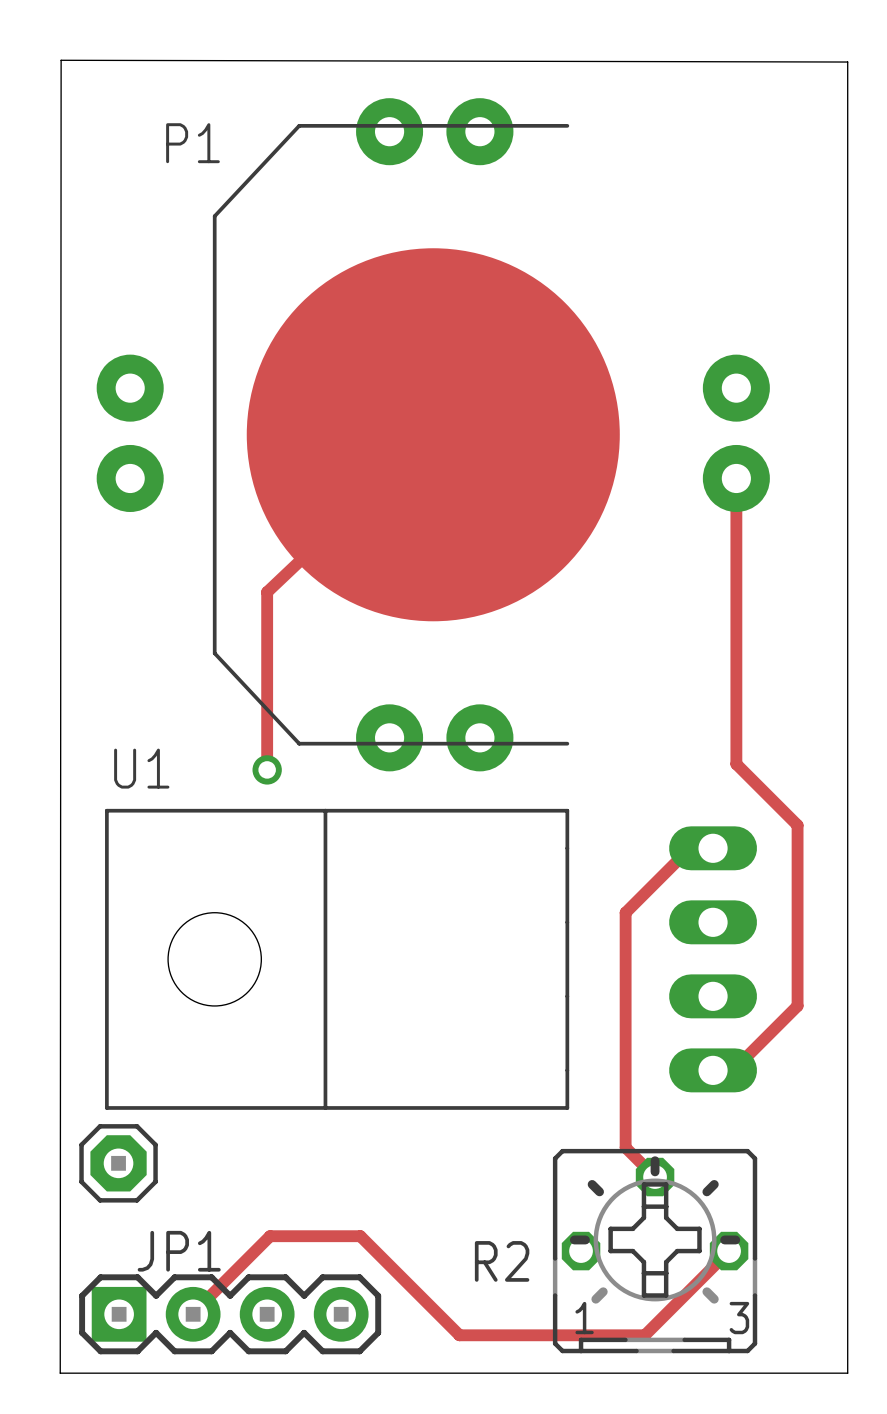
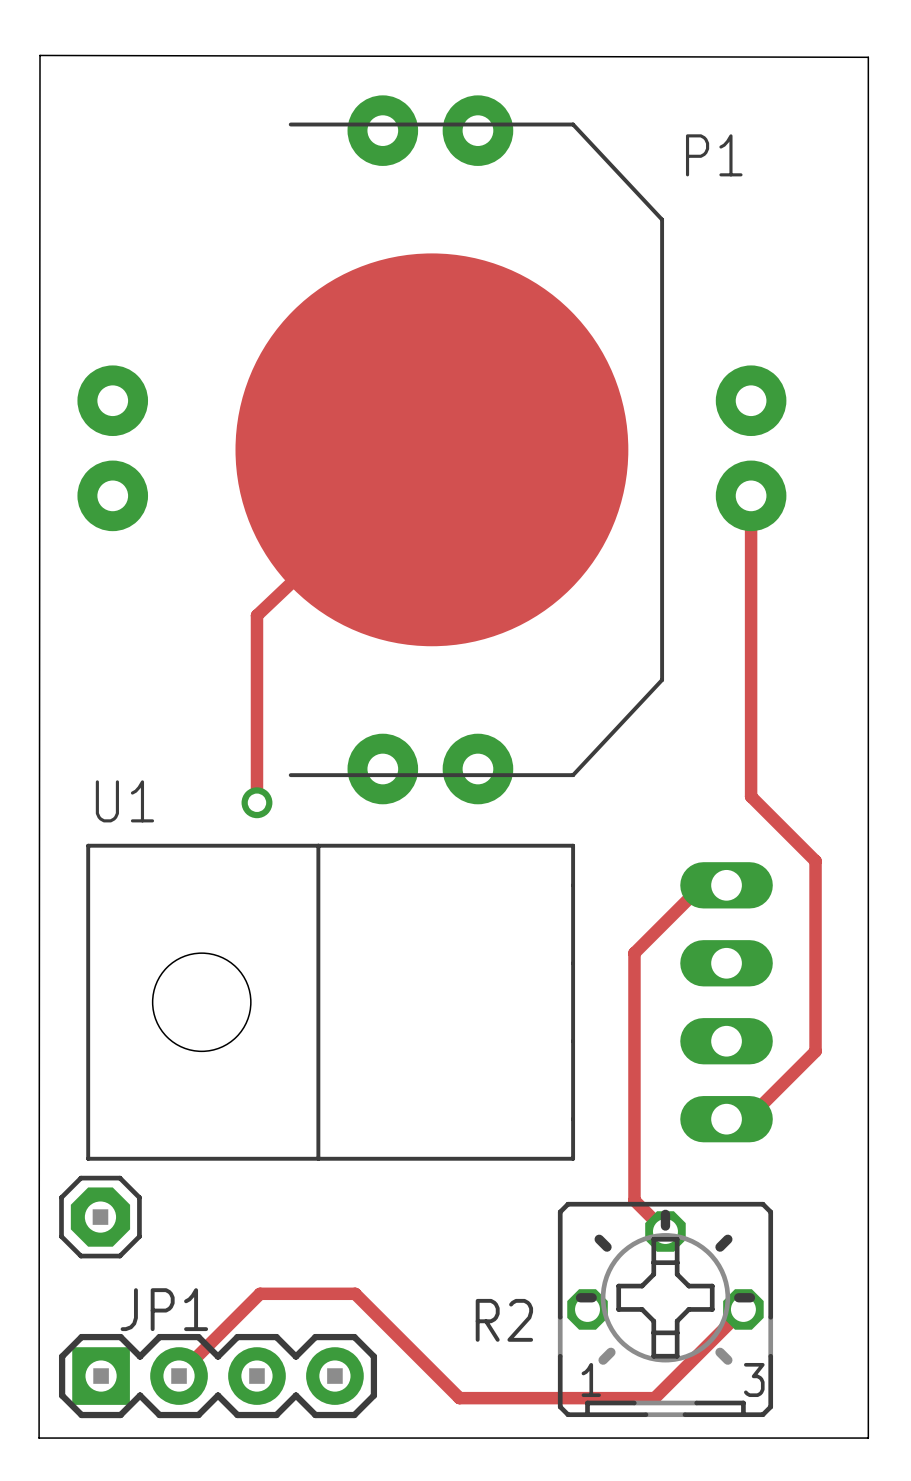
P1 name position: P1 (192, 143) -> P1 (714, 155)
P1 rotation: 0° (416, 434) -> 180° (449, 449)

